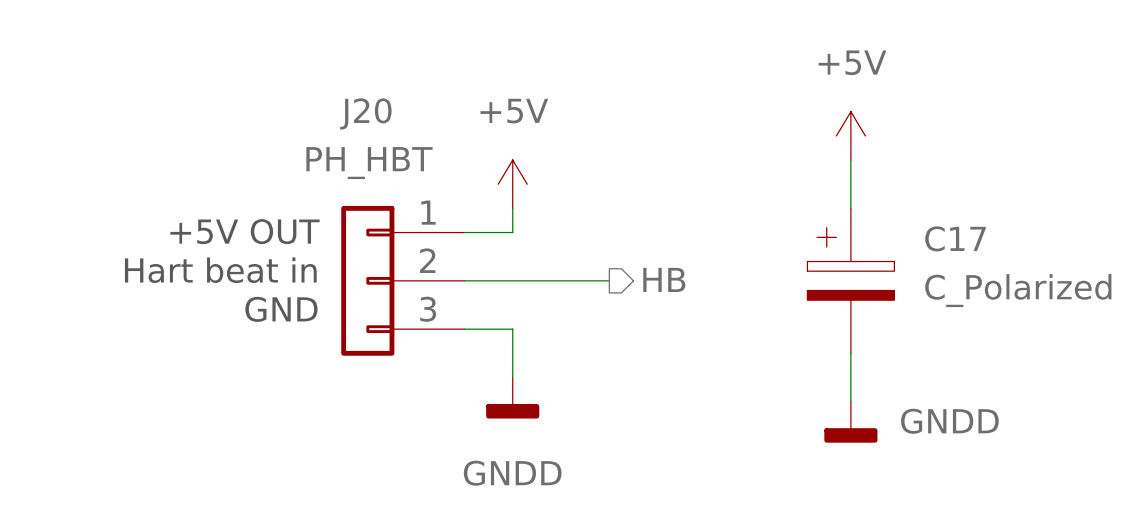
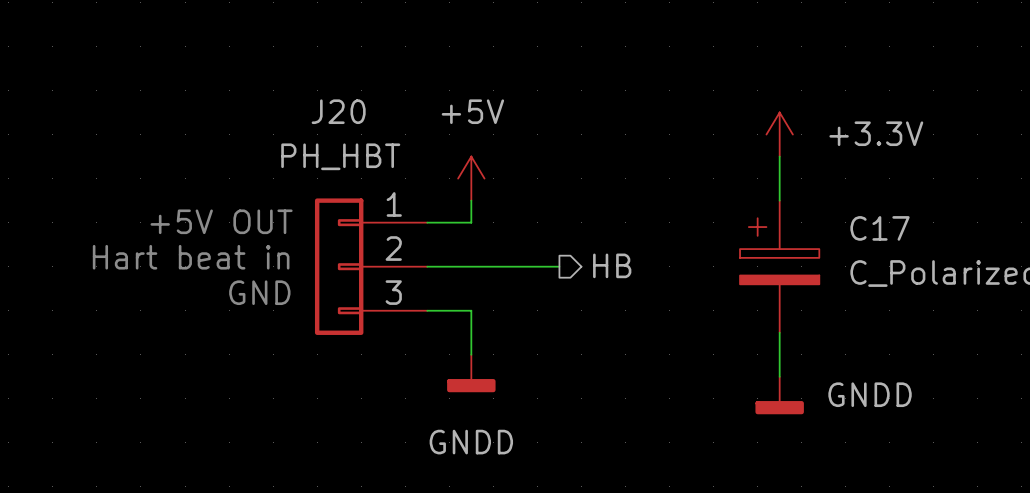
power symbol: +5V (850, 135) -> +3.3V (779, 134)

